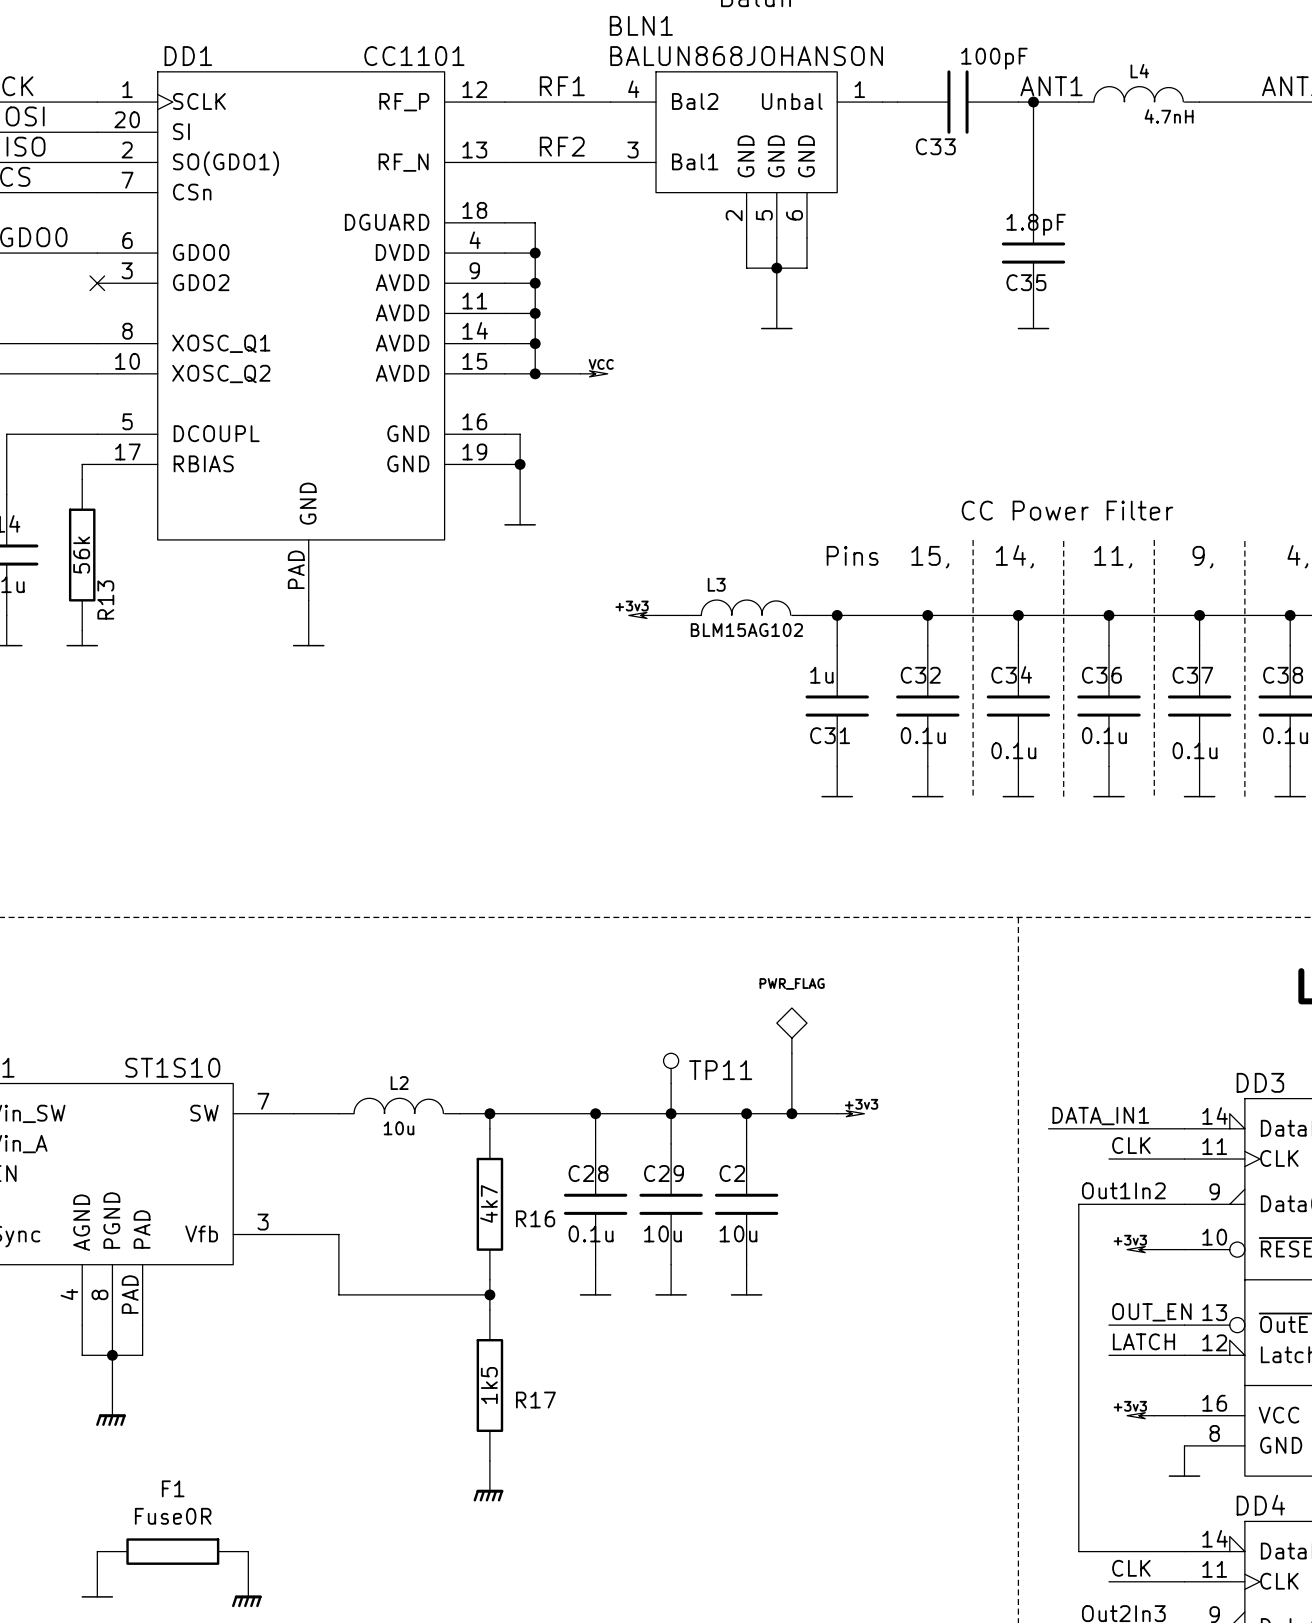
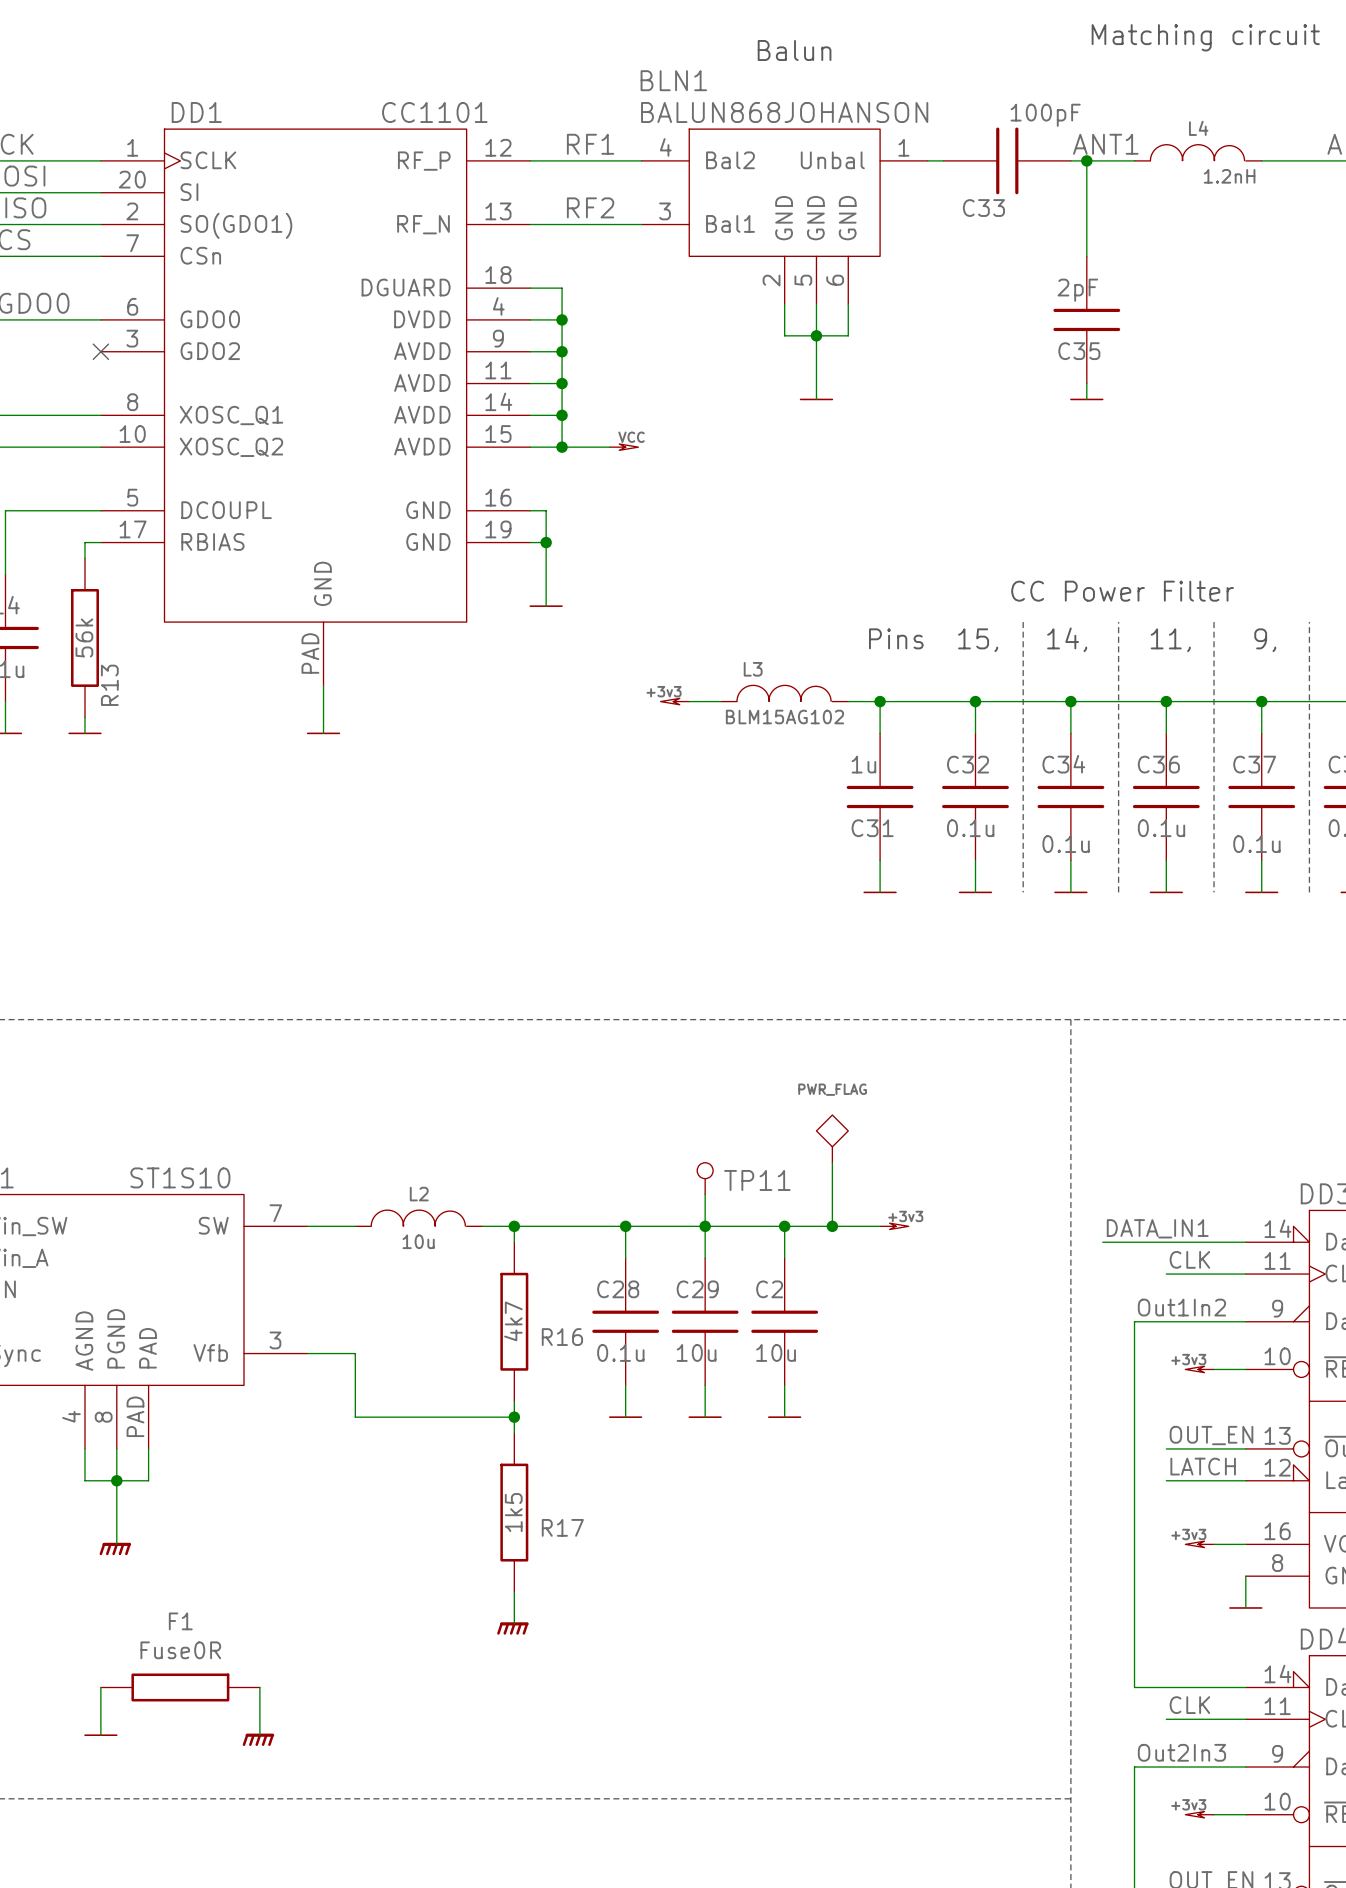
L4 value: 4.7nH (1169, 116) -> 1.2nH (1229, 176)
C35 value: 1.8pF (1036, 224) -> 2pF (1077, 290)

